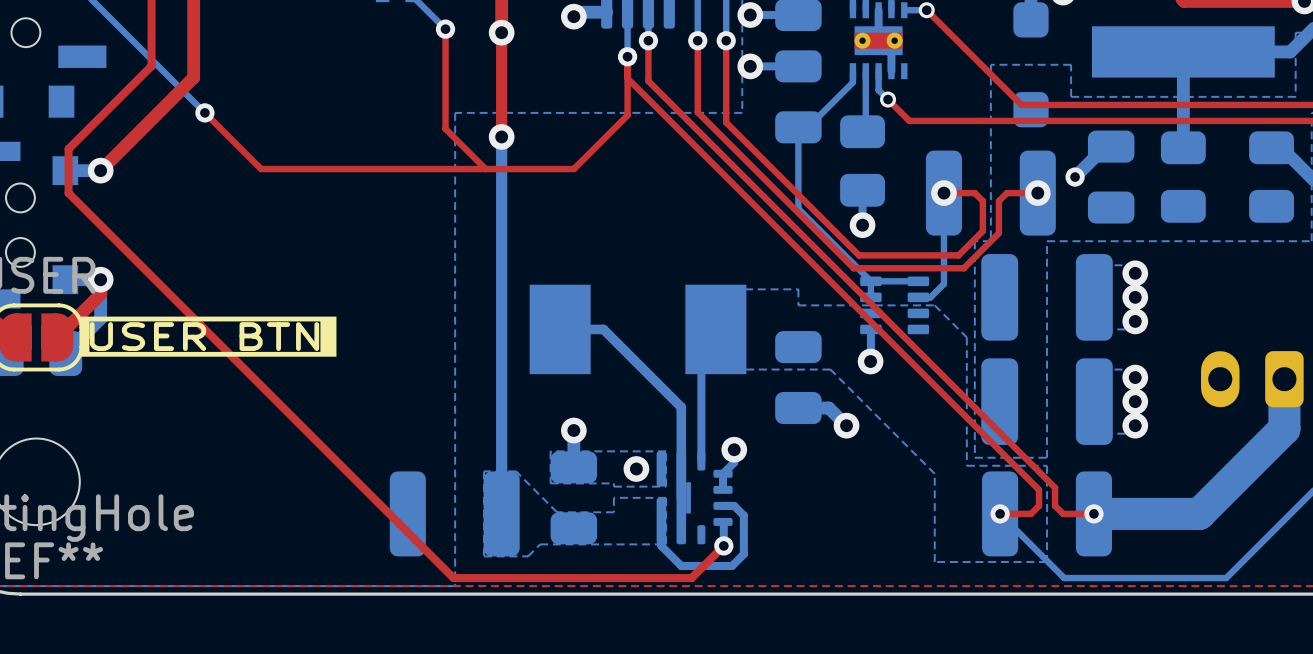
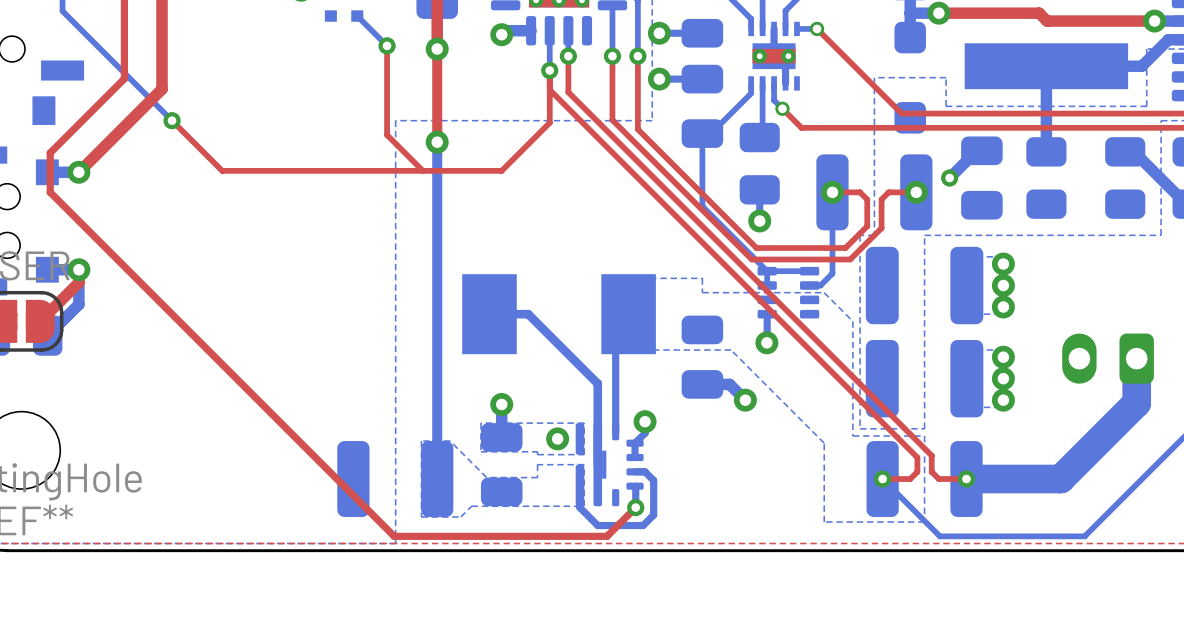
drawing: [78, 316, 337, 357] -> none
text: USER BTN (204, 336) -> none

